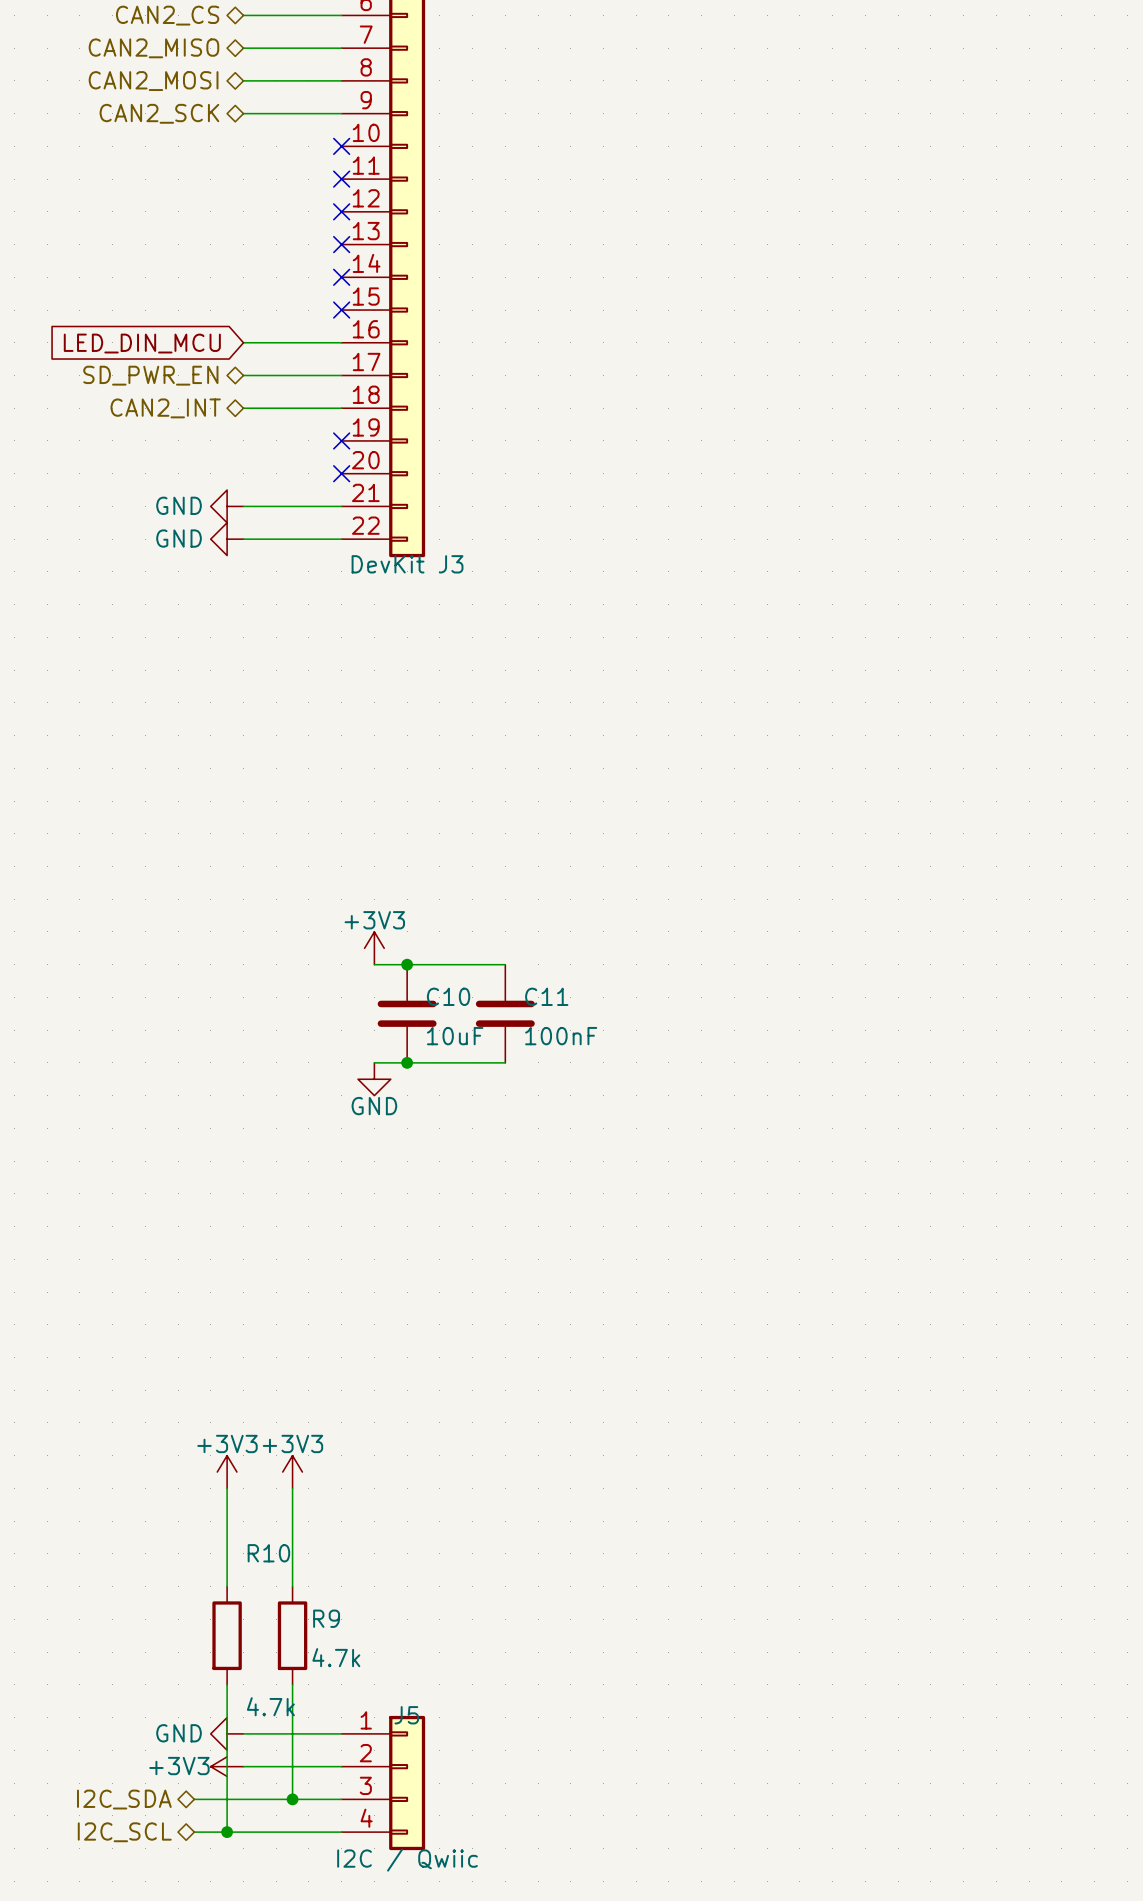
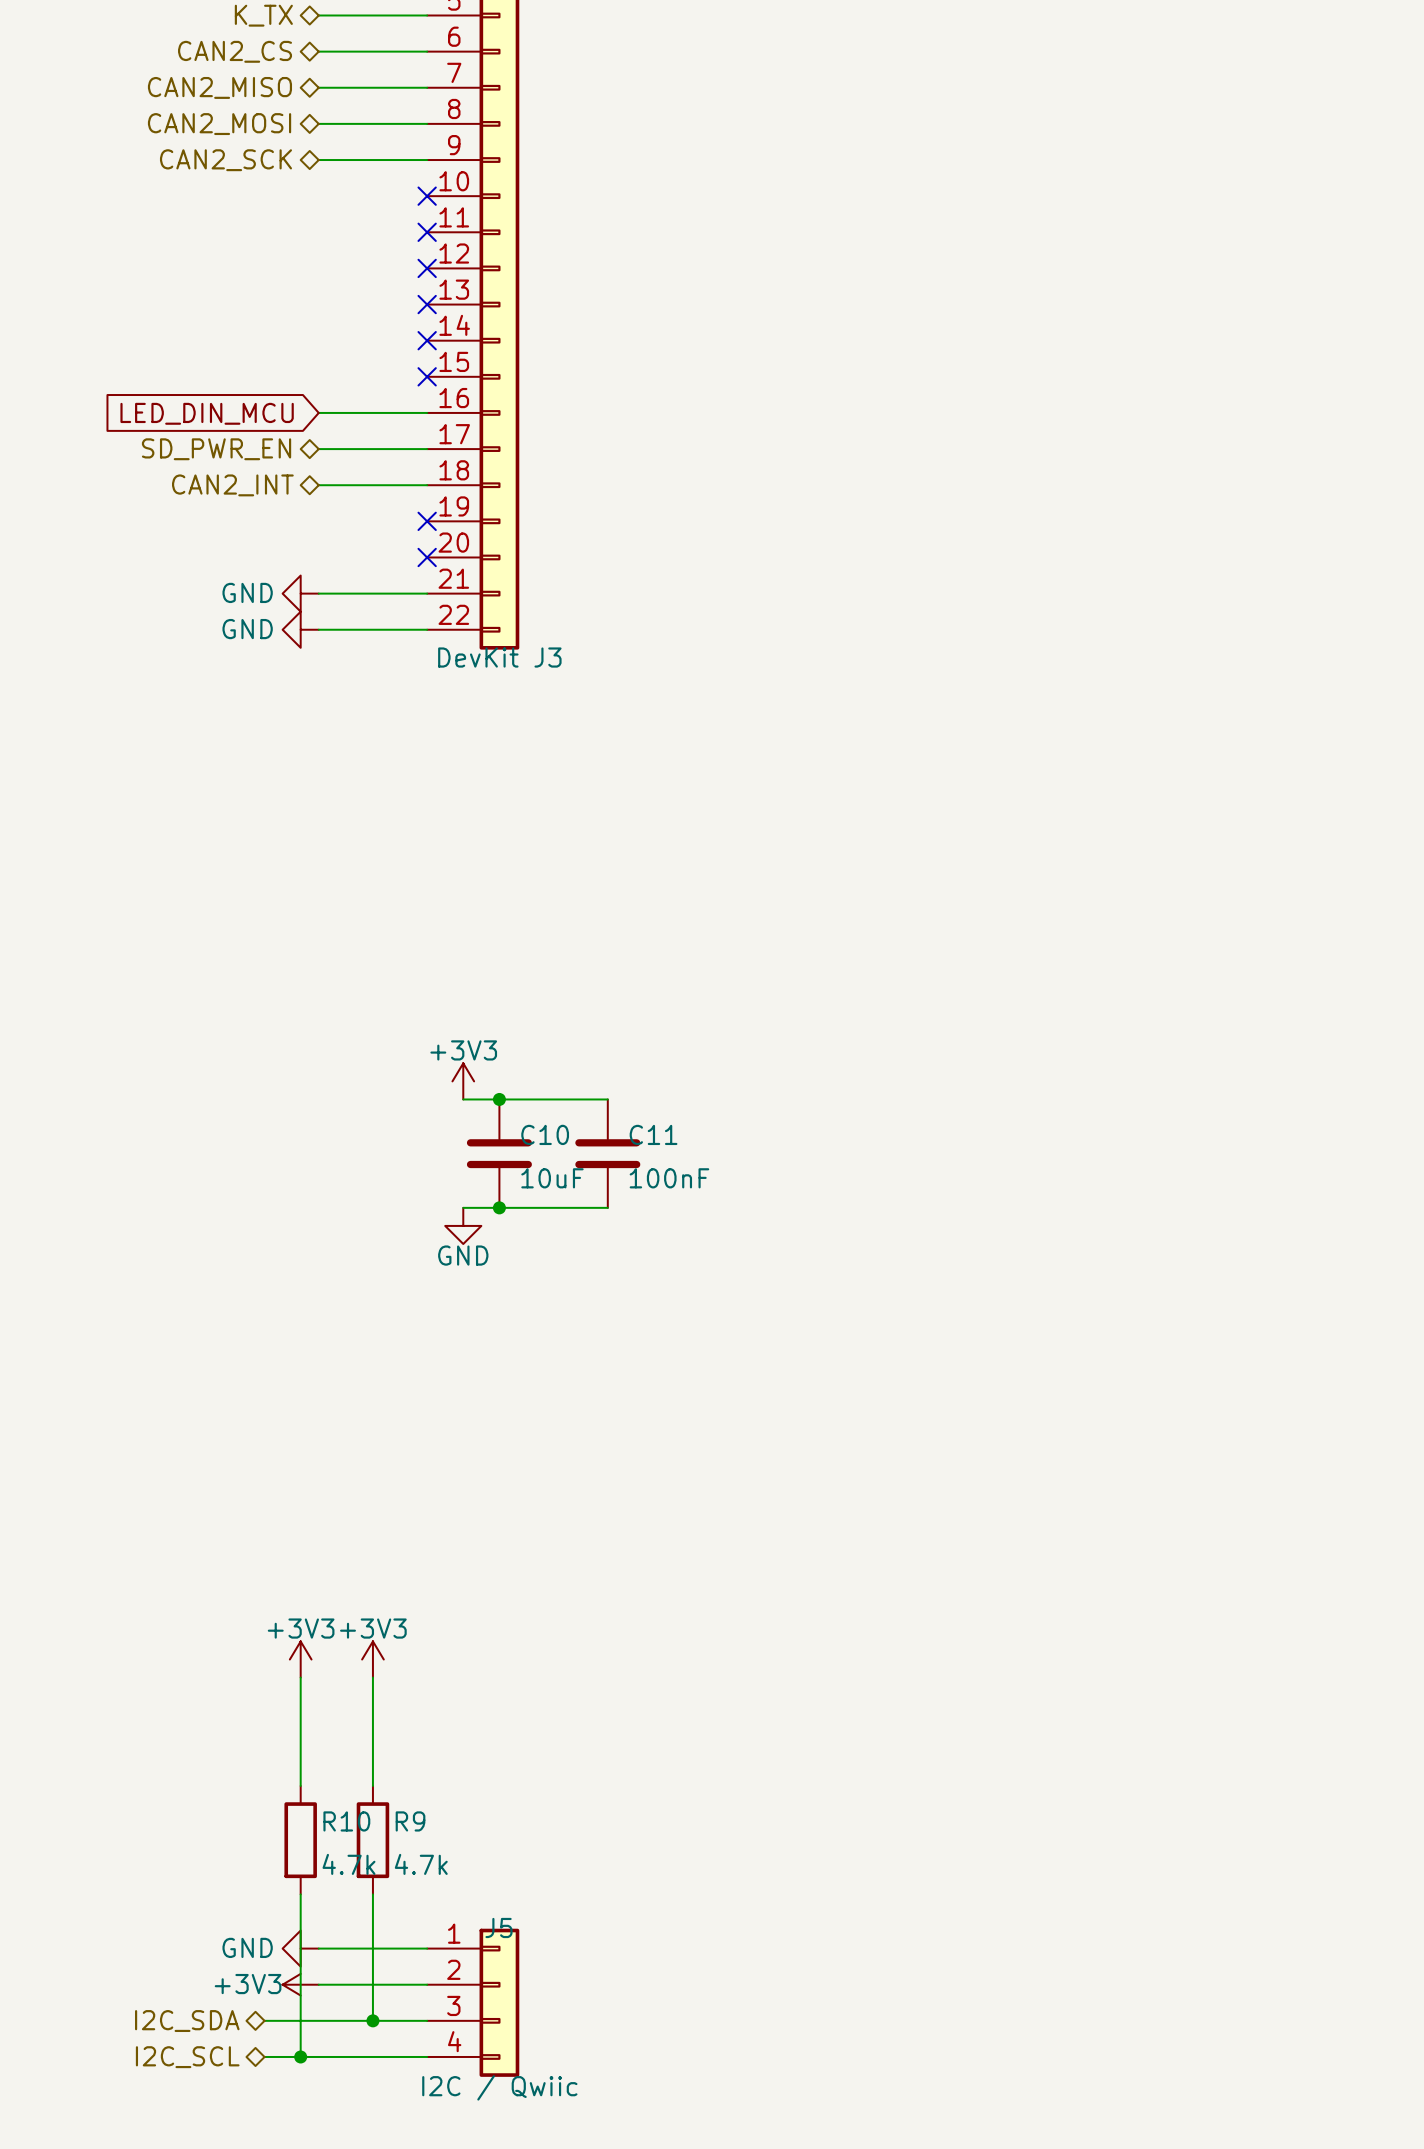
R10 name position: R10 (268, 1553) -> R10 (346, 1821)
R10 value position: 4.7k (270, 1706) -> 4.7k (349, 1864)

